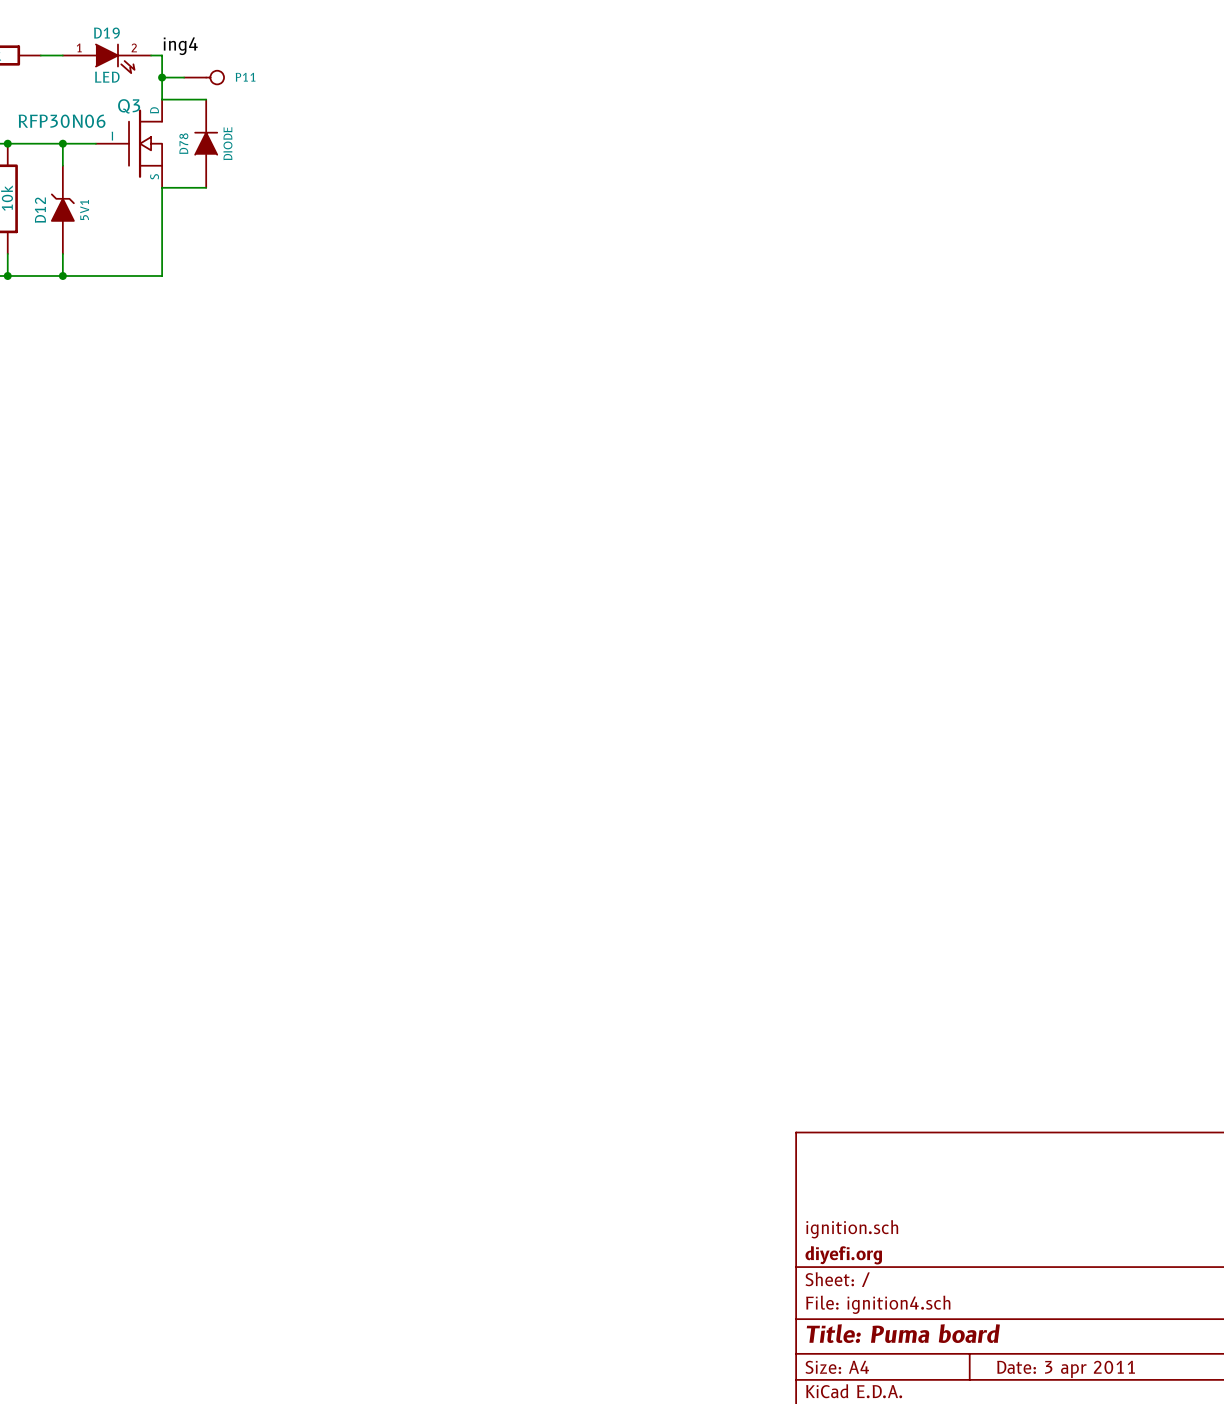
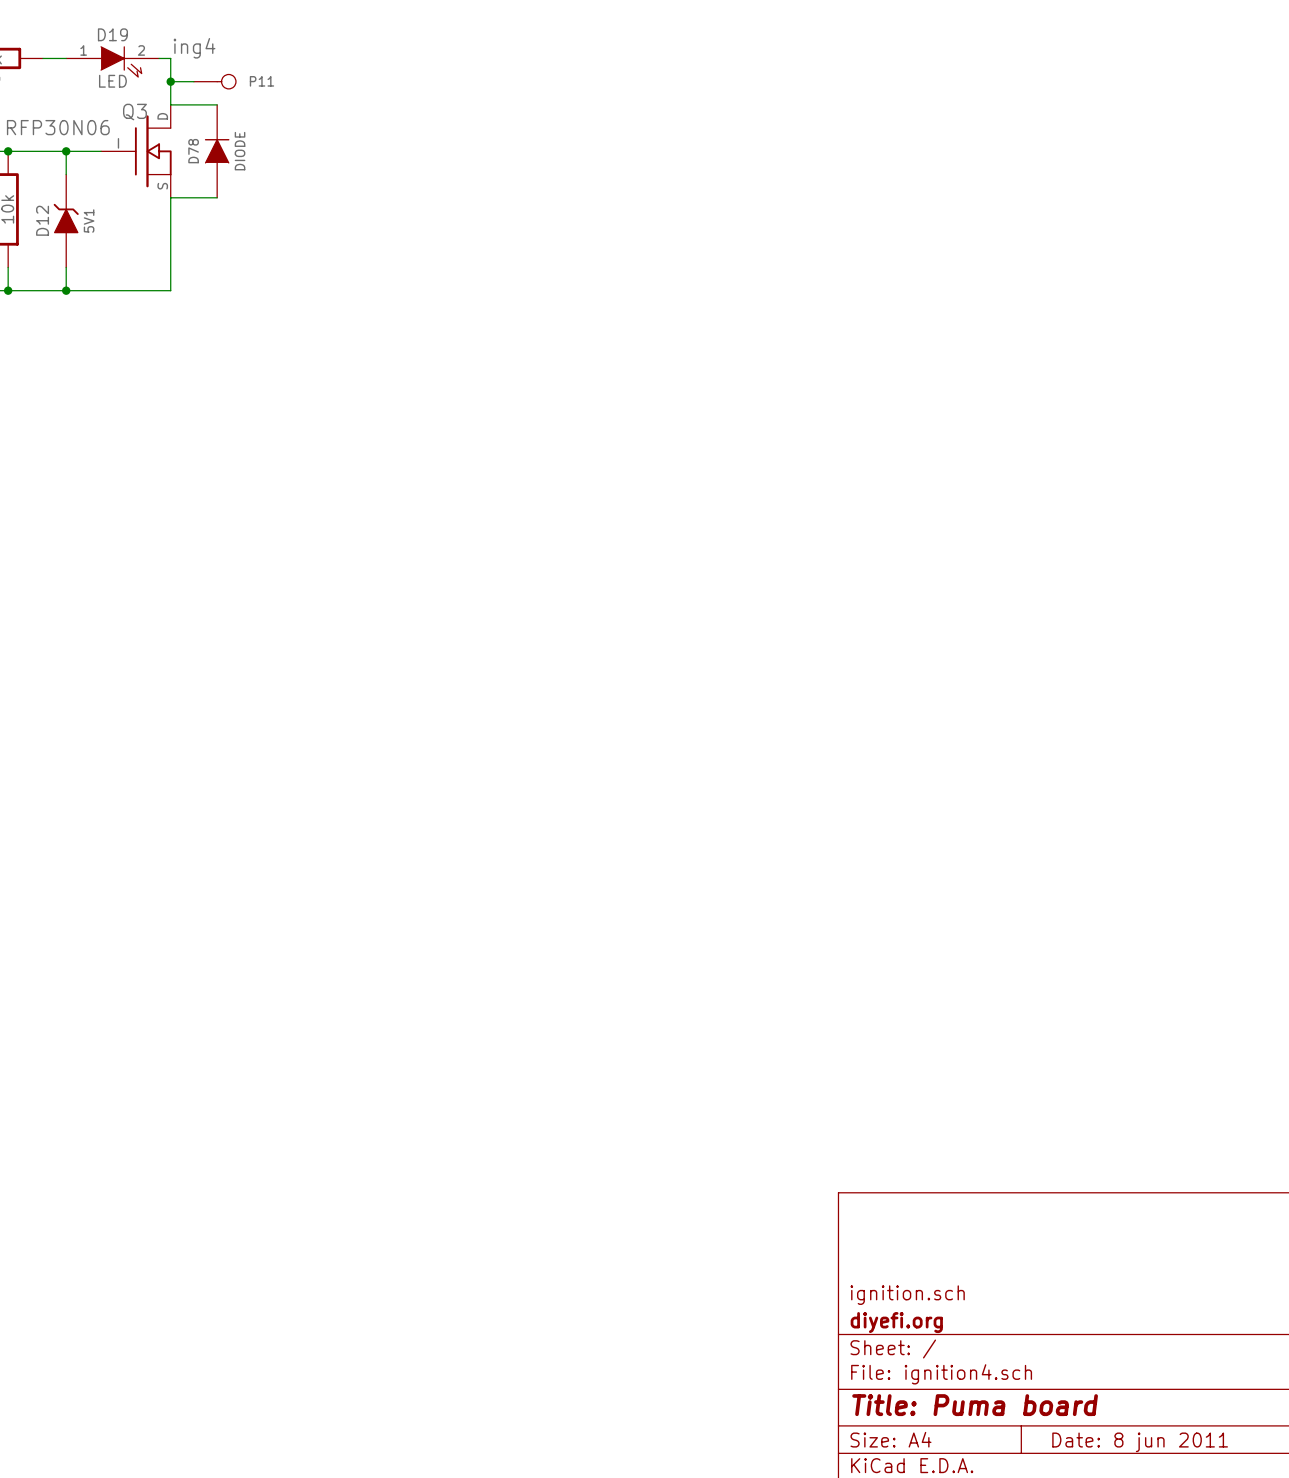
title block: Date: 3 apr 2011 (1066, 1369) -> Date: 8 jun 2011 (1140, 1442)

